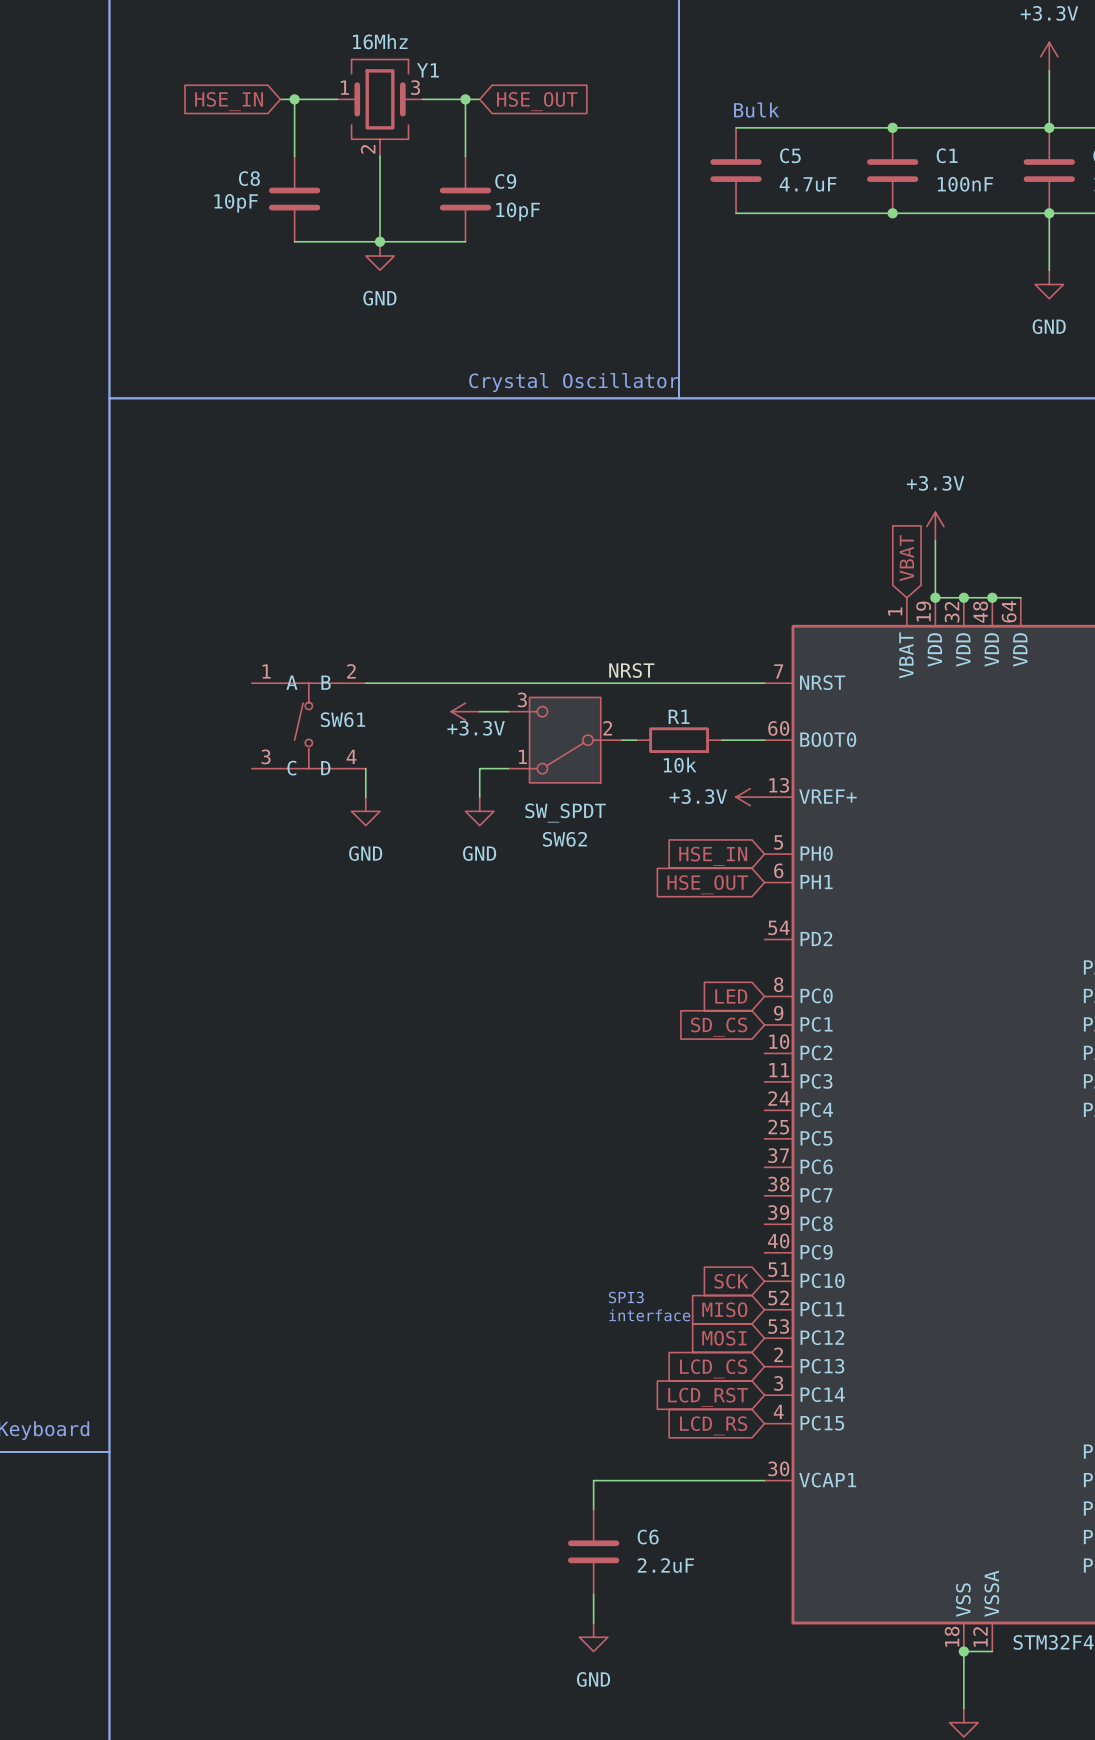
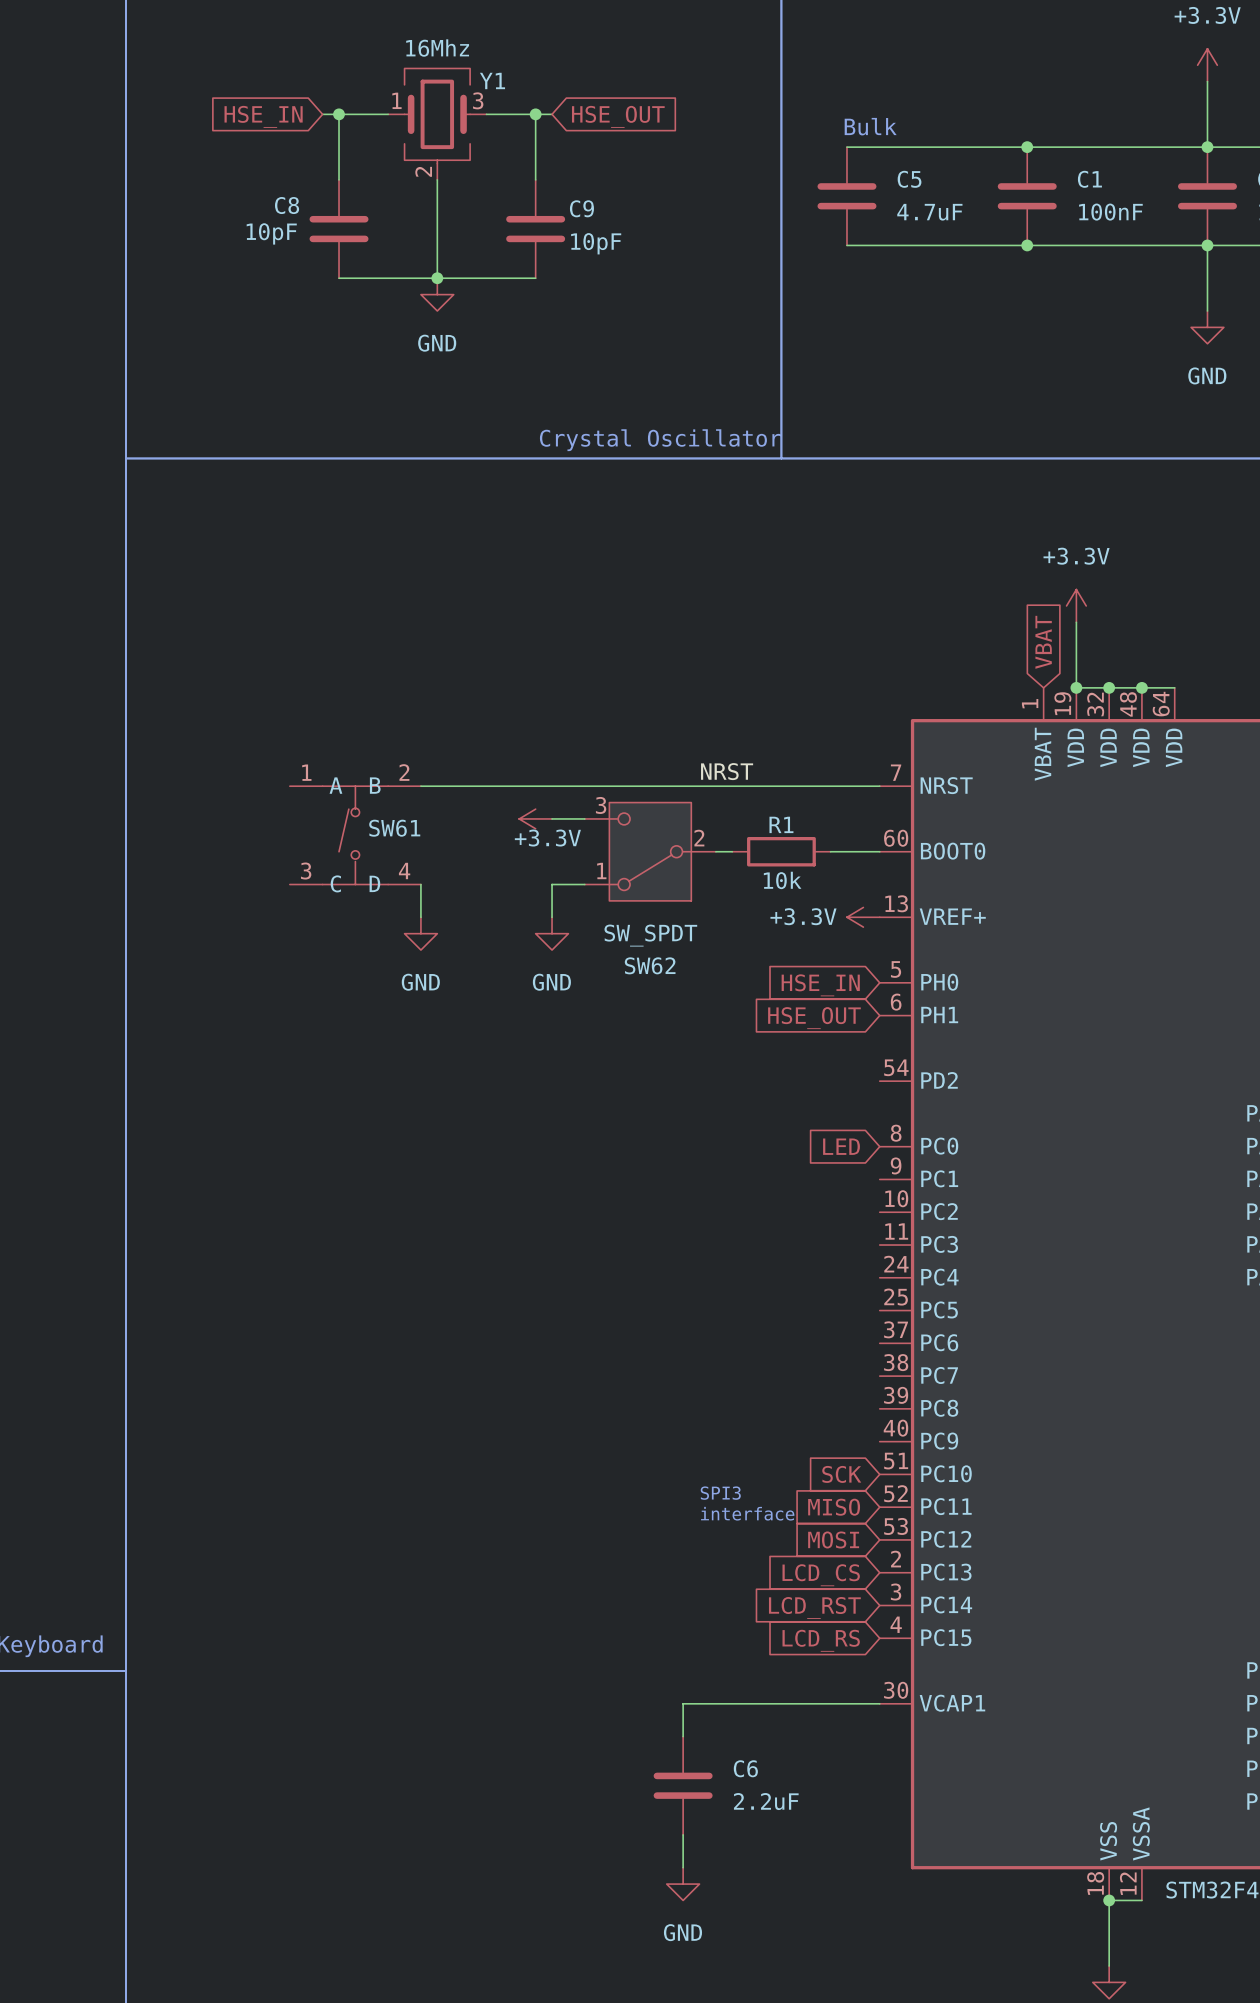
global label: SD_CS (719, 1027) -> none

